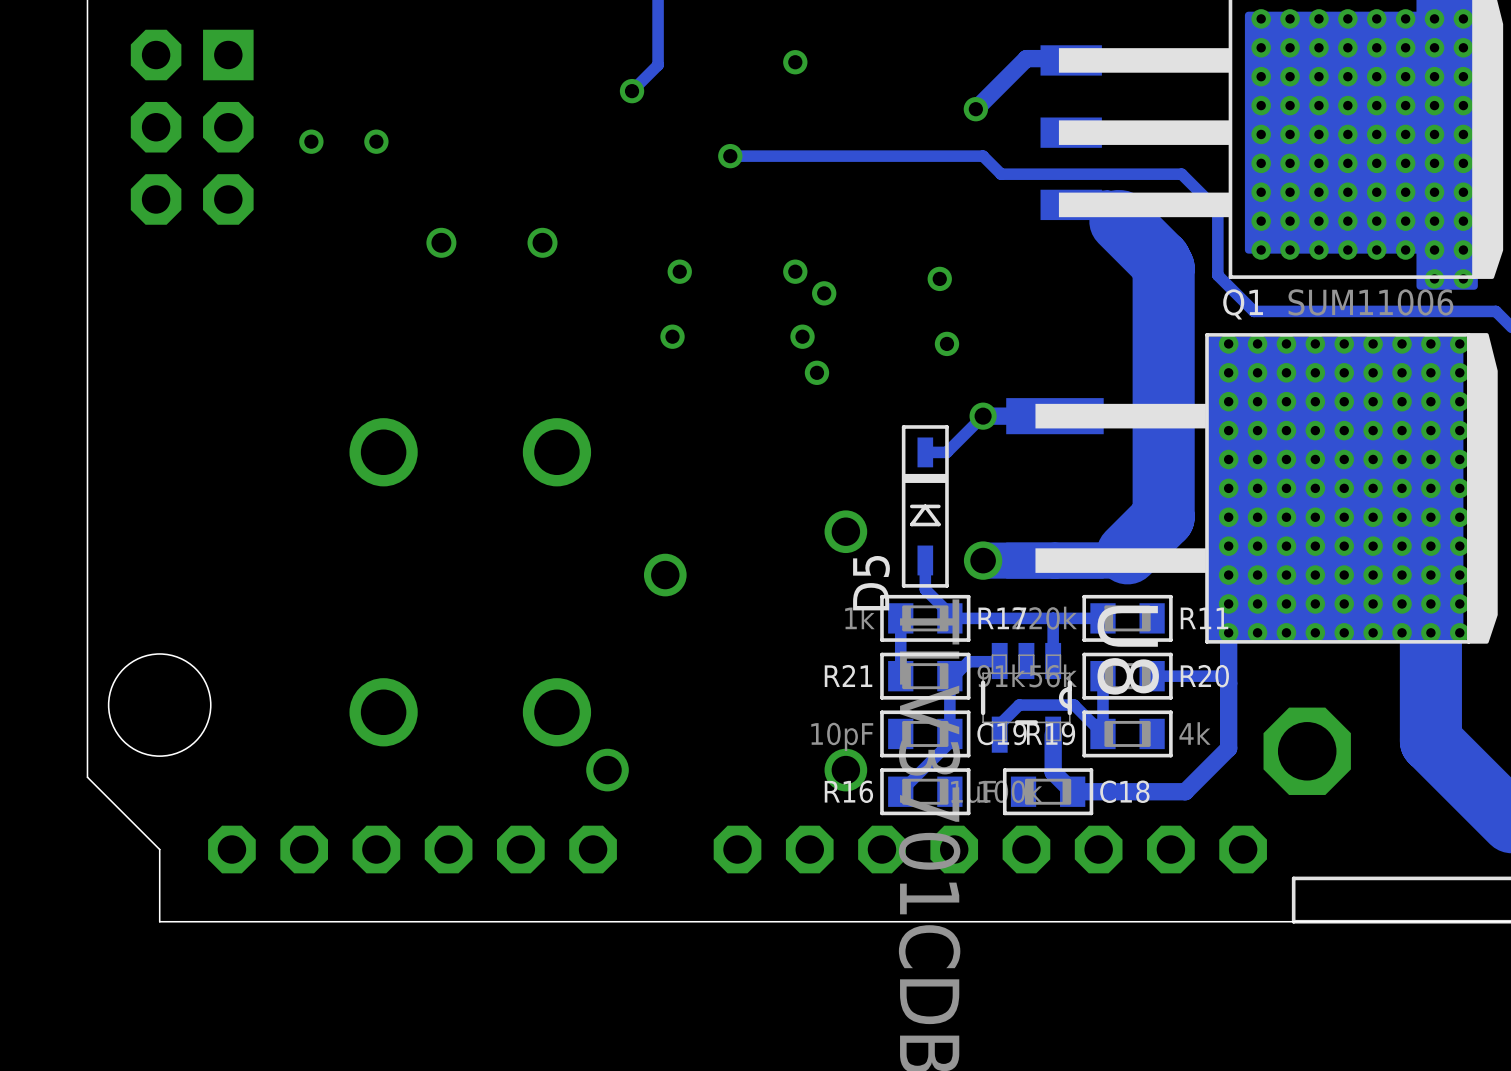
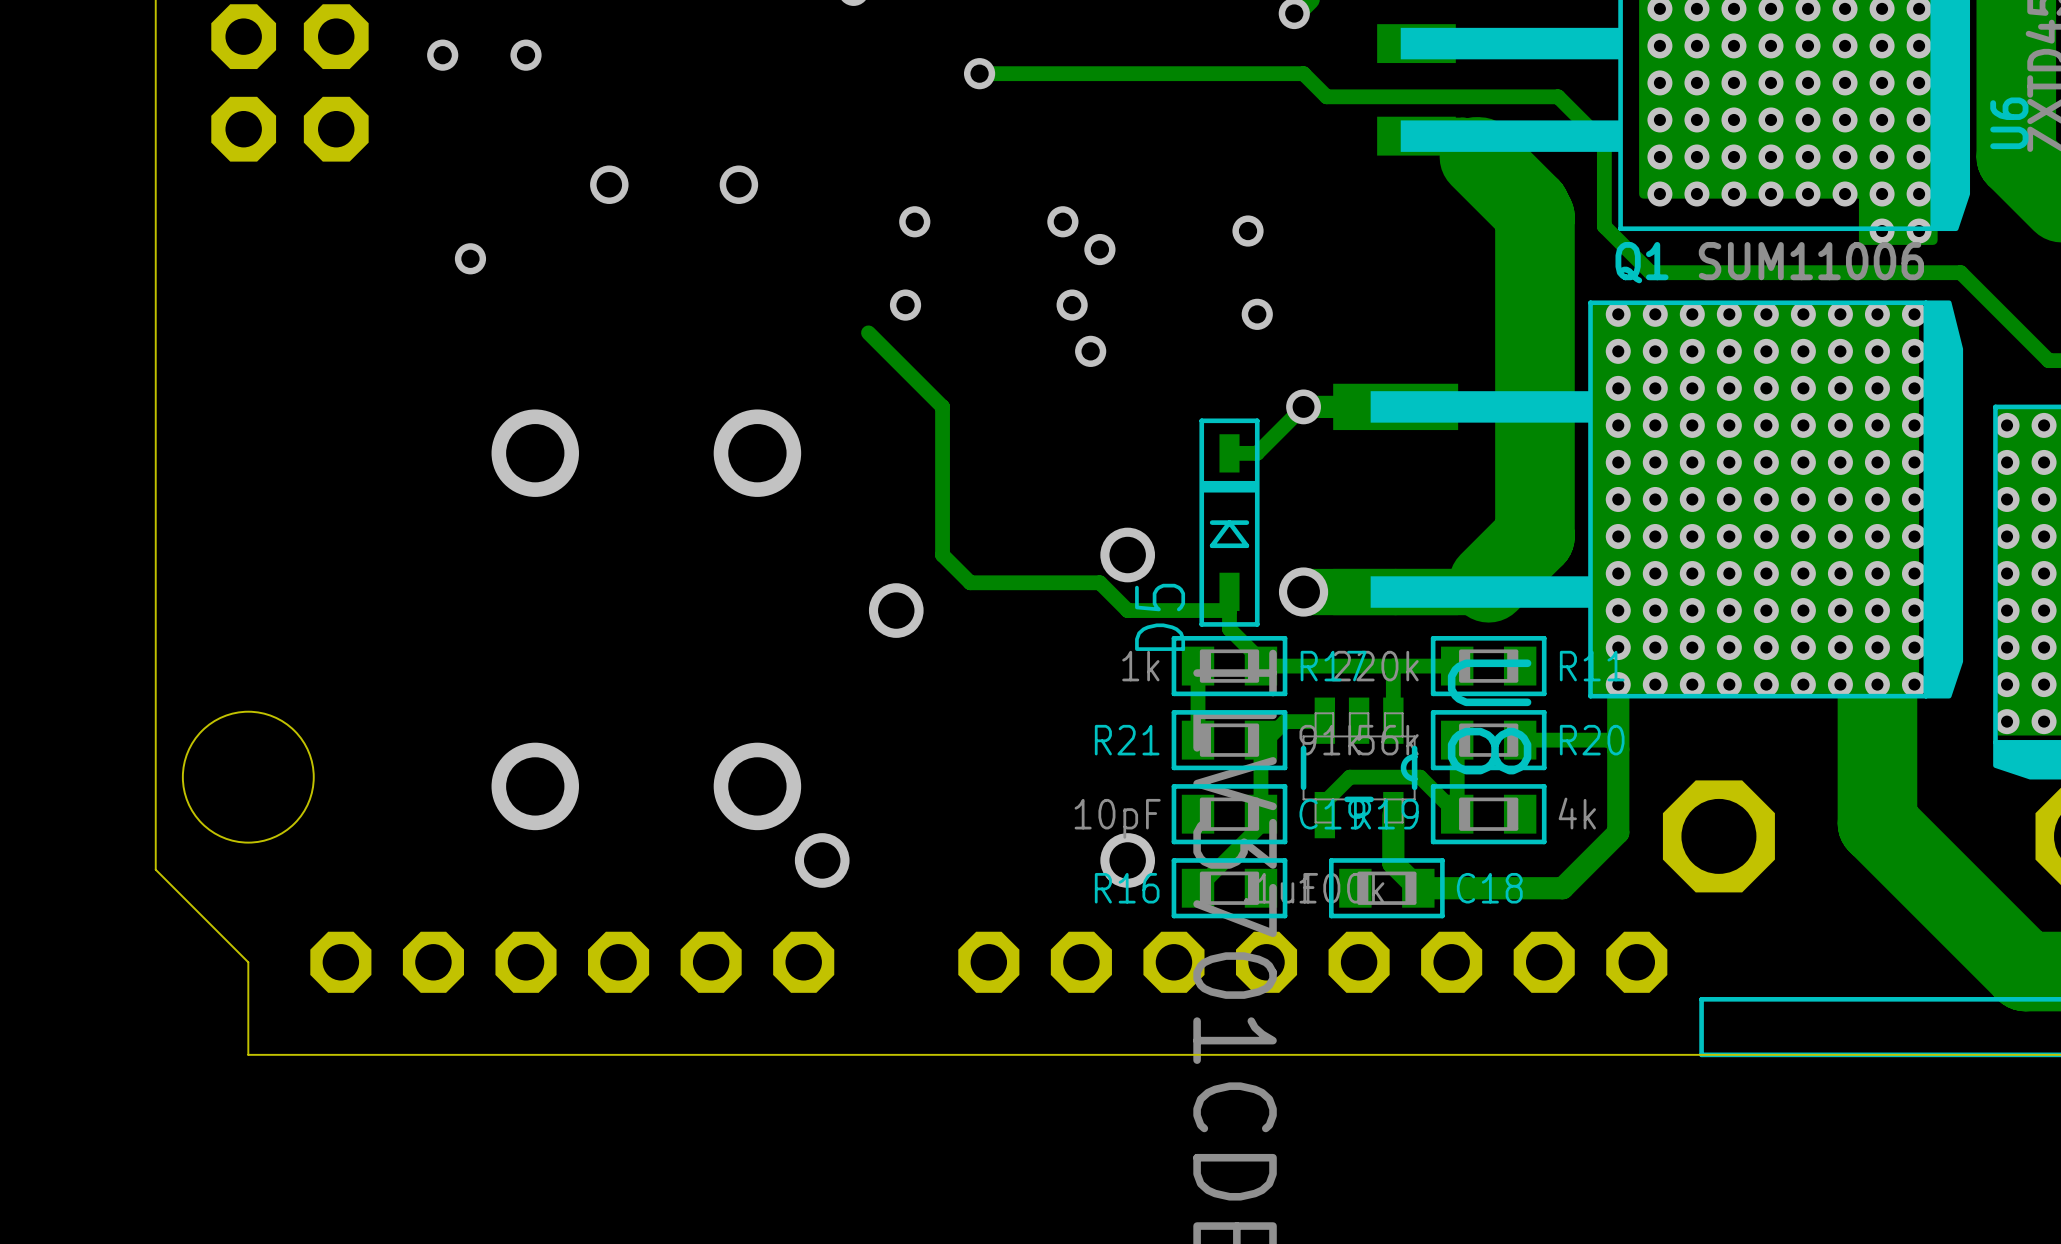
via: none -> (470, 258)
track: none -> (868, 332) (942, 406) (942, 555) (970, 582) (1099, 582) (1127, 610) (1229, 610)

